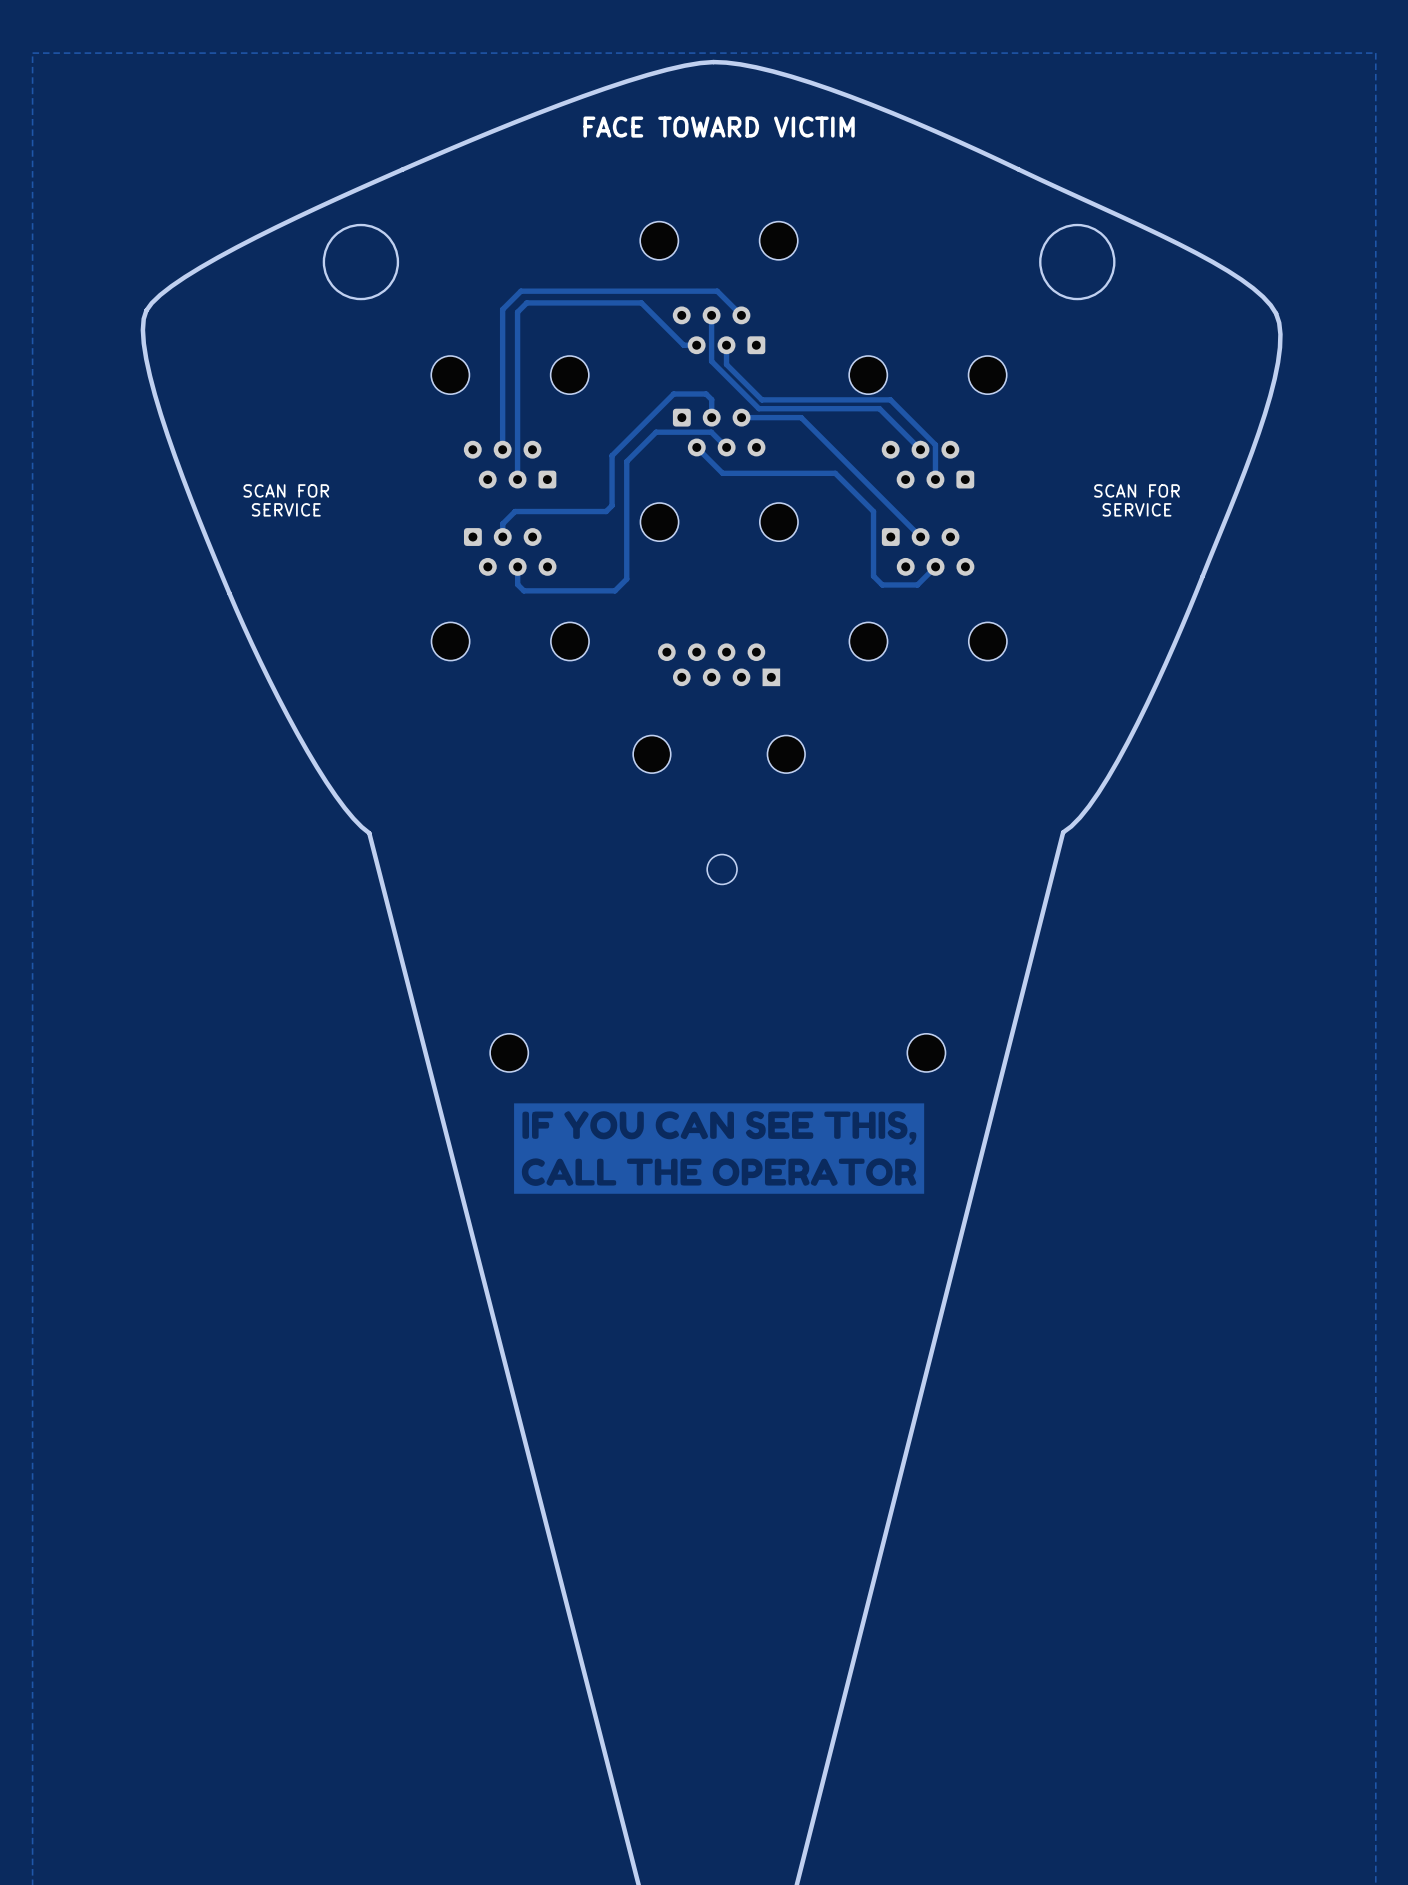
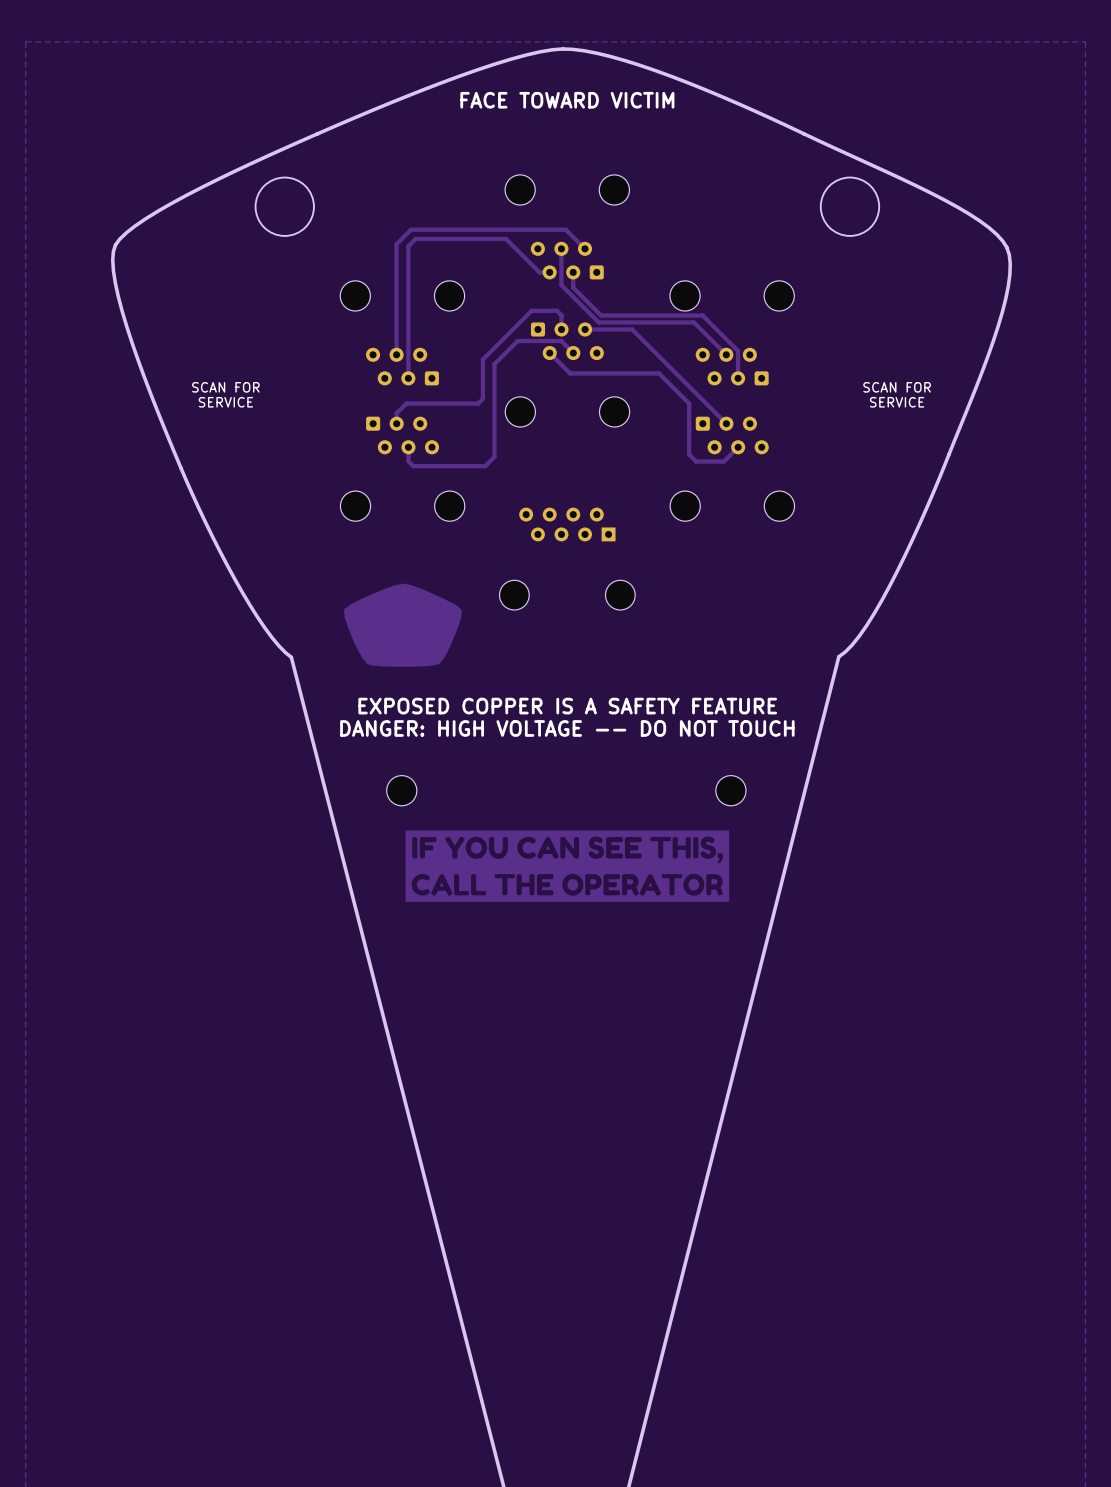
drawing: none -> [344, 583, 462, 667]
round board edge: [706, 853, 738, 885] -> none
text: none -> EXPOSED COPPER IS A SAFETY FEATURE (567, 706)
text: none -> DANGER: HIGH VOLTAGE -- DO NOT TOUCH (567, 728)
part position: (509, 1052) -> (401, 790)
part position: (926, 1052) -> (730, 790)
drawing position: (719, 1148) -> (567, 866)

